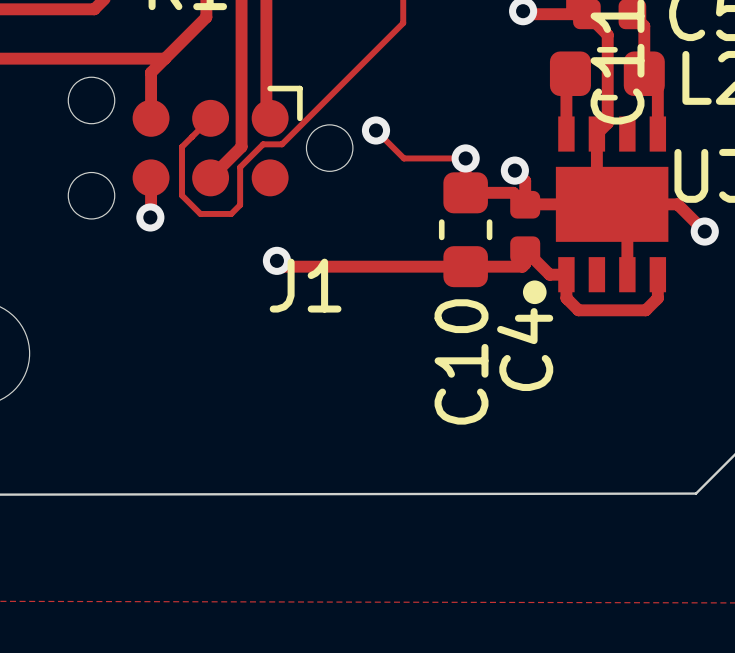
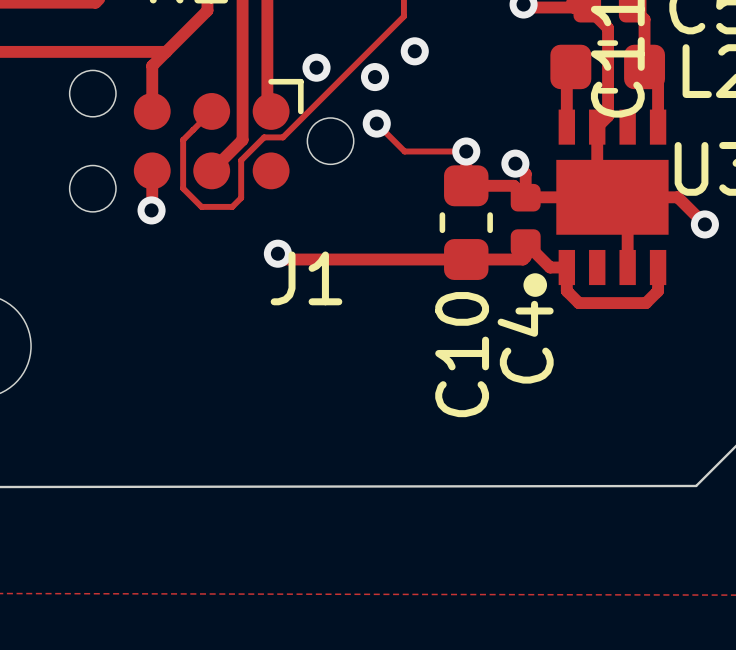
via: none -> (414, 51)
via: none -> (316, 67)
via: none -> (375, 77)

